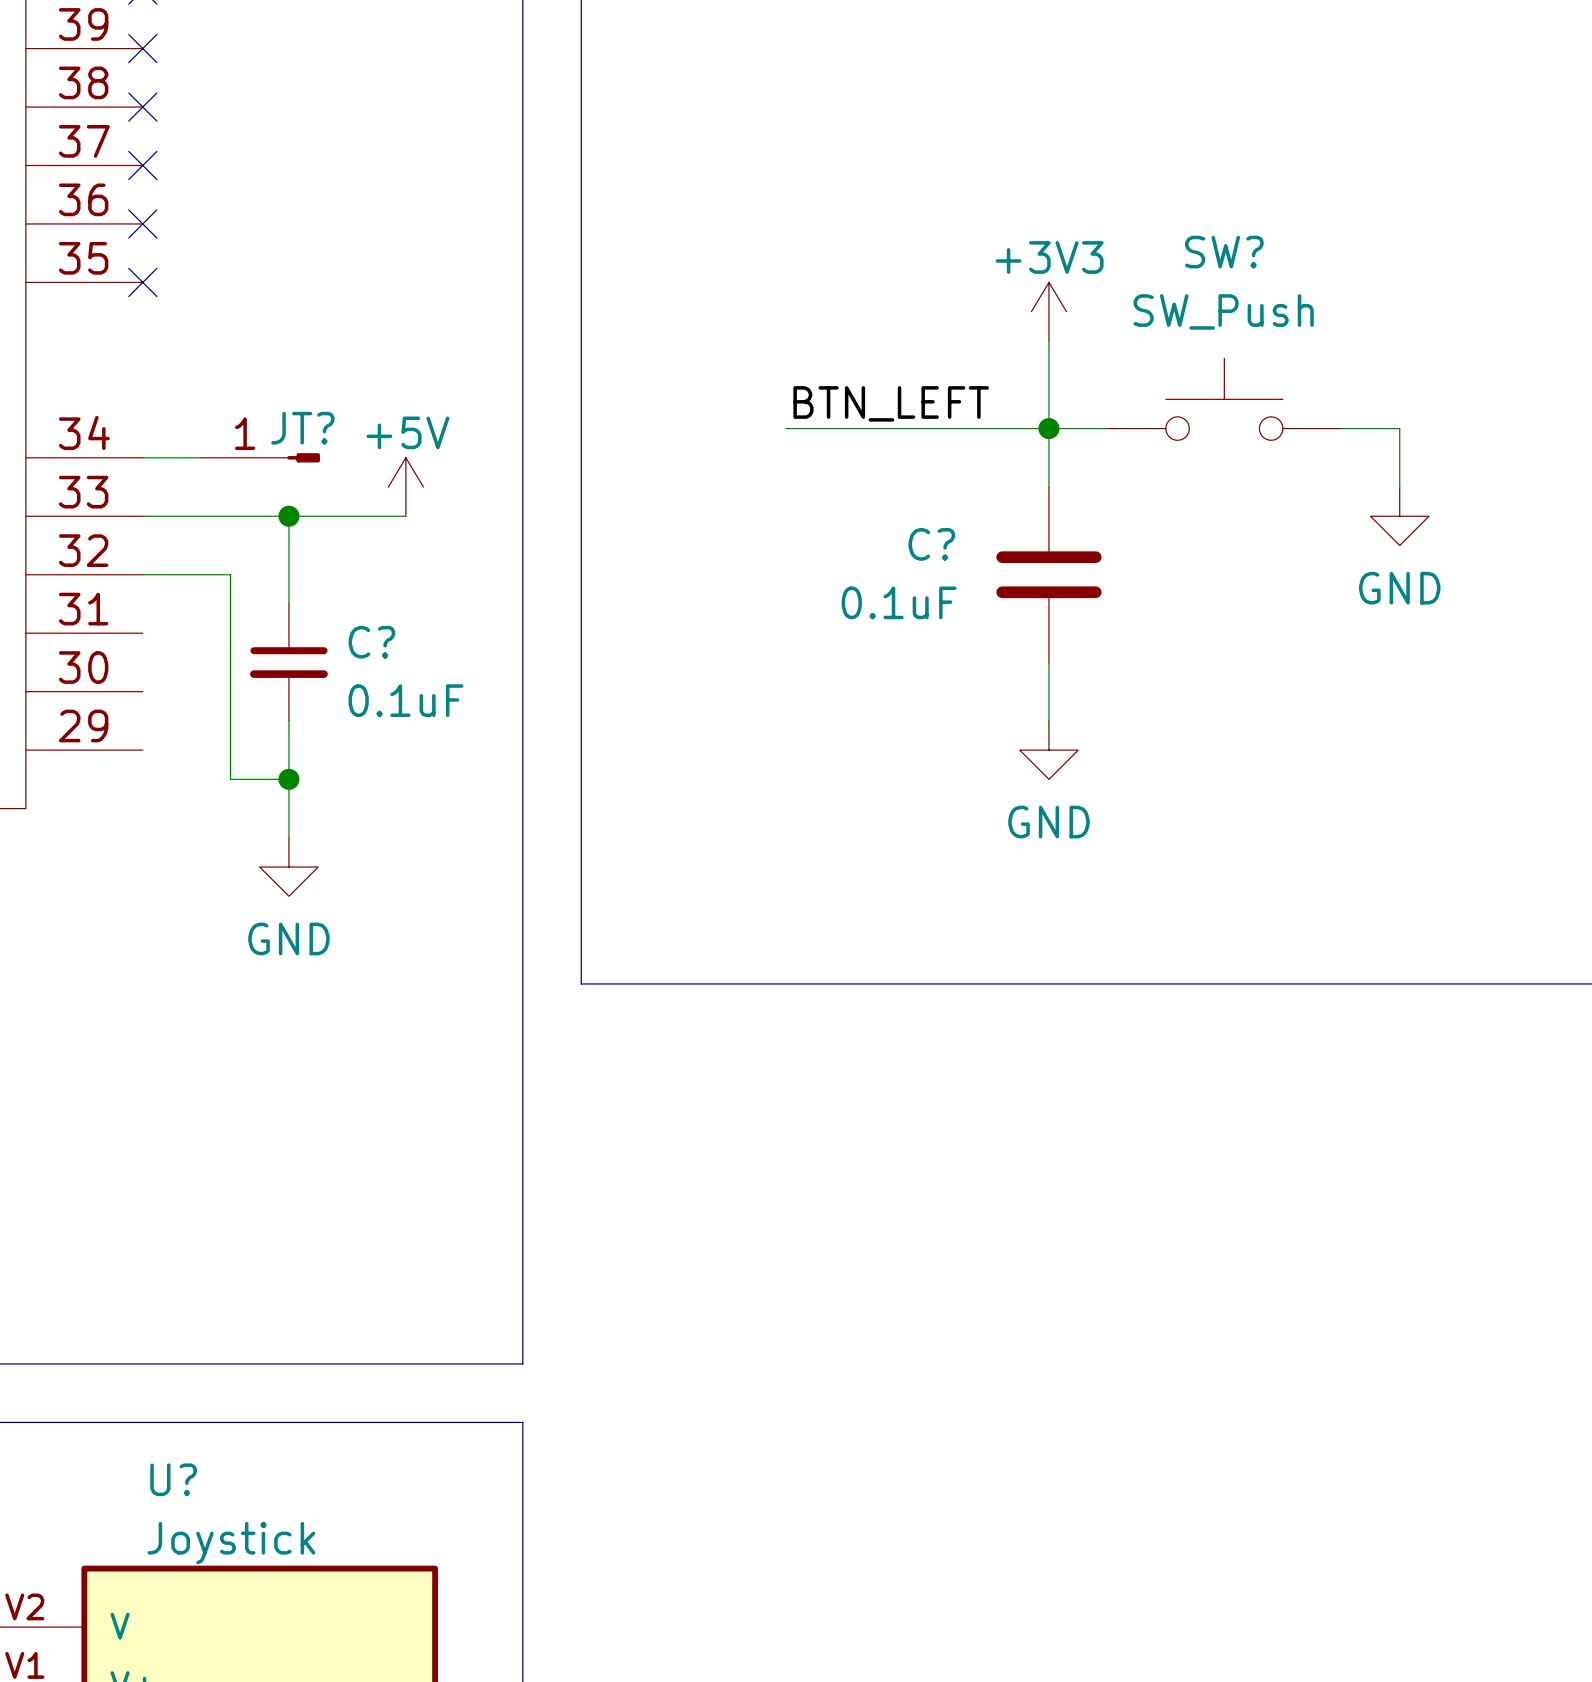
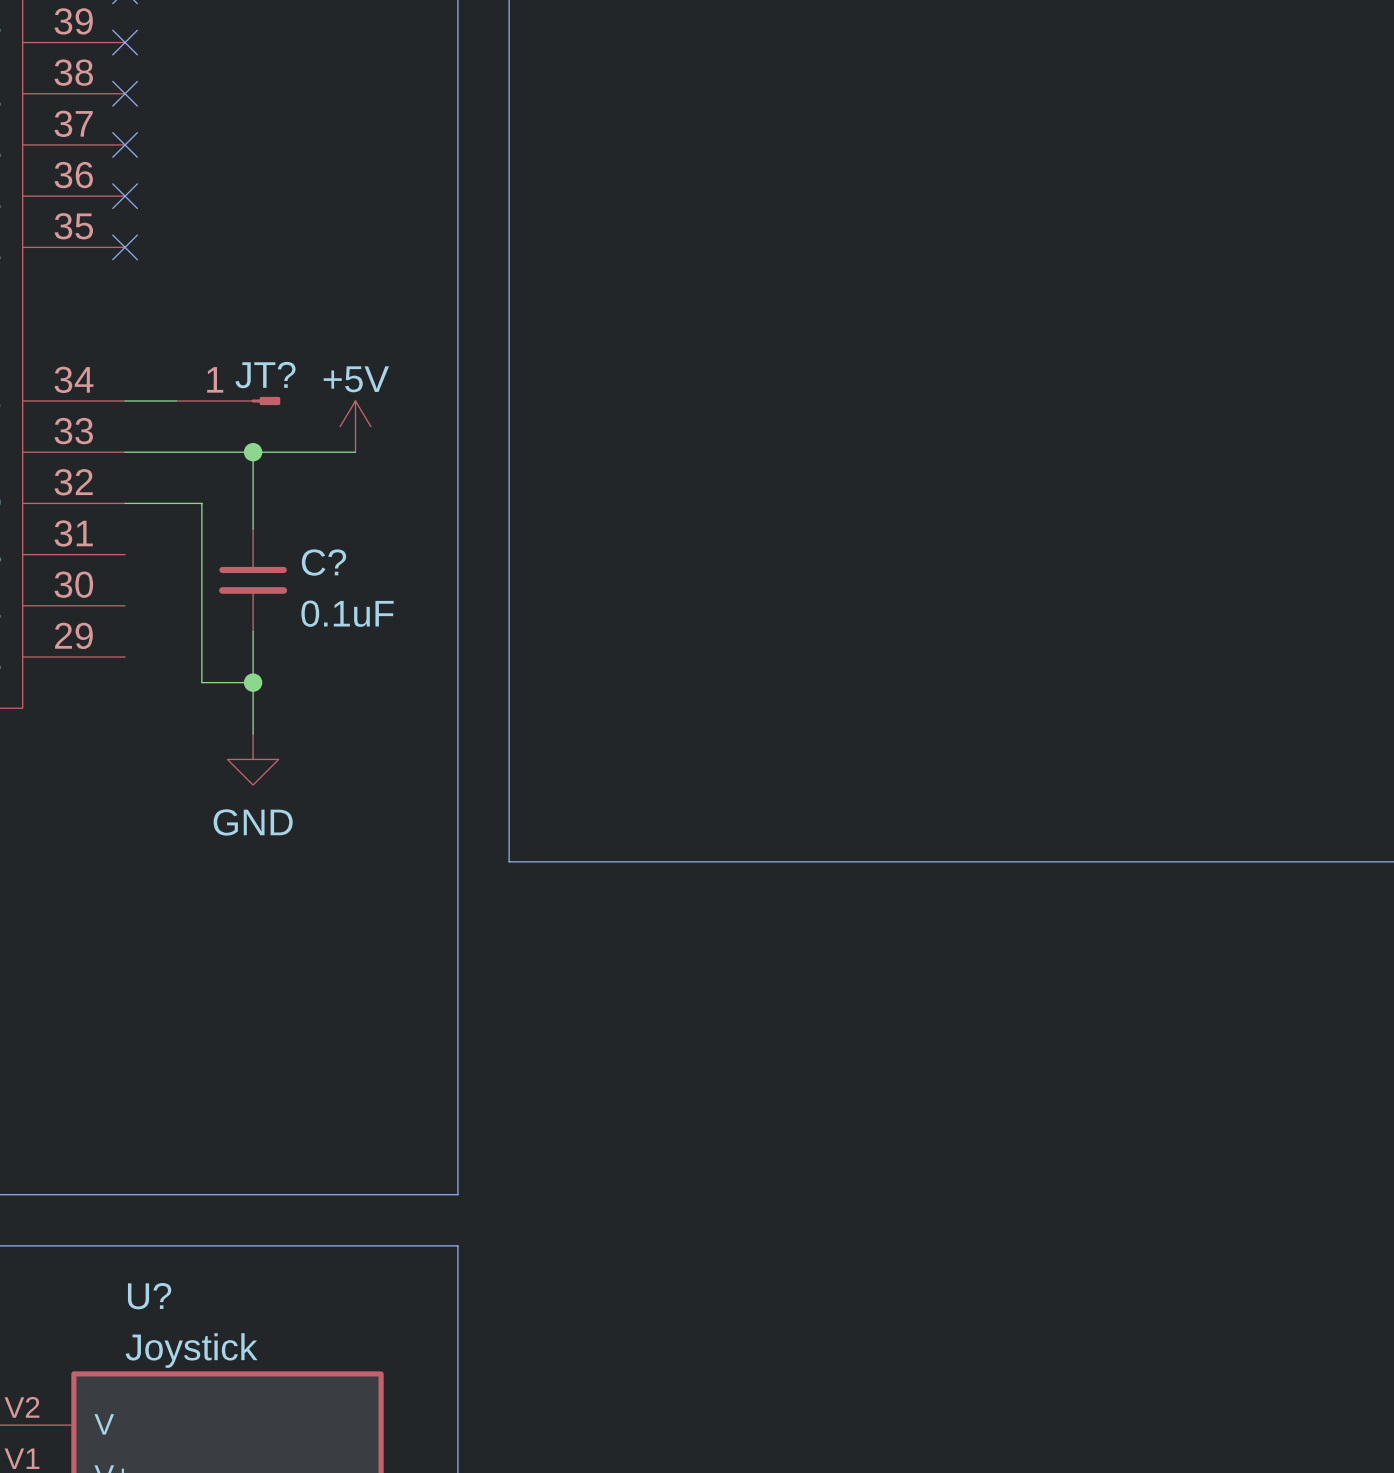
power symbol: +3V3 (1048, 311) -> none
wire: (1048, 340) (1048, 487) -> none
SW?: SW_Push (1224, 399) -> none
label: BTN_LEFT (891, 403) -> none
wire: (785, 428) (1107, 428) -> none
junction: (1048, 428) -> none
wire: (1341, 428) (1399, 428) (1399, 487) -> none
power symbol: GND (1399, 516) -> none
C?: 0.1uF (1048, 574) -> none
wire: (1048, 662) (1048, 720) -> none
power symbol: GND (1048, 750) -> none

